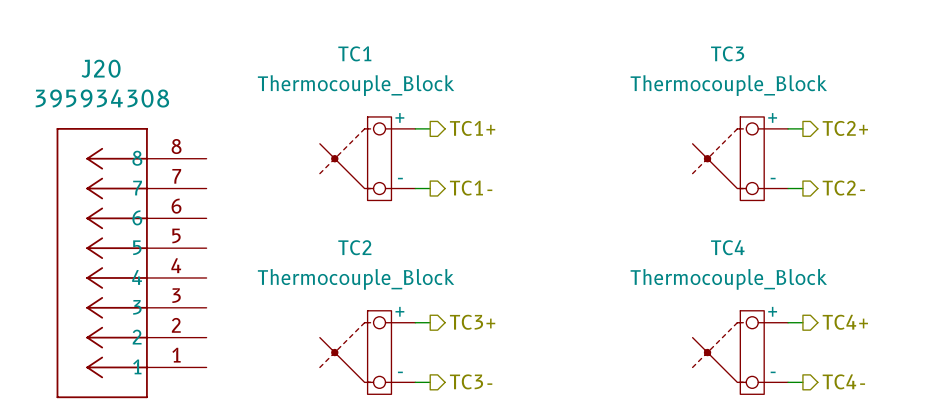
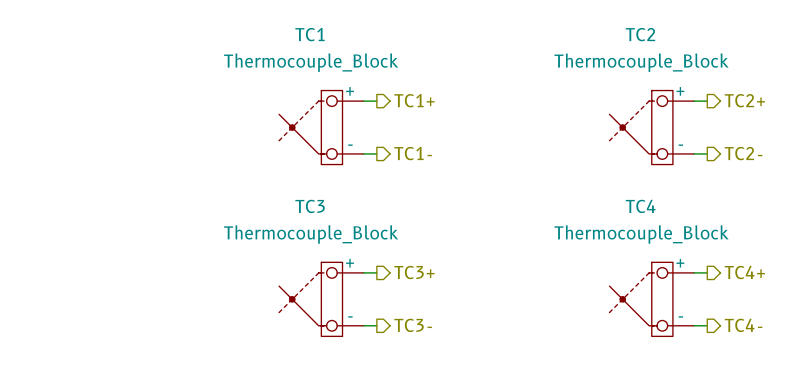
TC3 name: TC3 (727, 53) -> TC2 (640, 34)
TC2 name: TC2 (354, 247) -> TC3 (310, 206)
J20: 395934308 (131, 263) -> none

